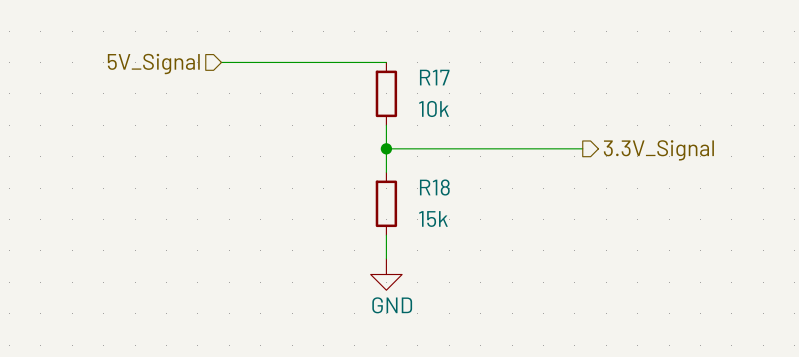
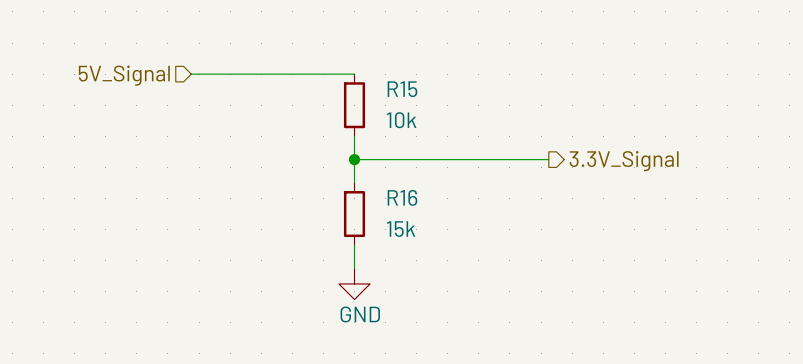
R17 name: R17 (434, 77) -> R15 (402, 89)
R18 name: R18 (434, 187) -> R16 (402, 197)

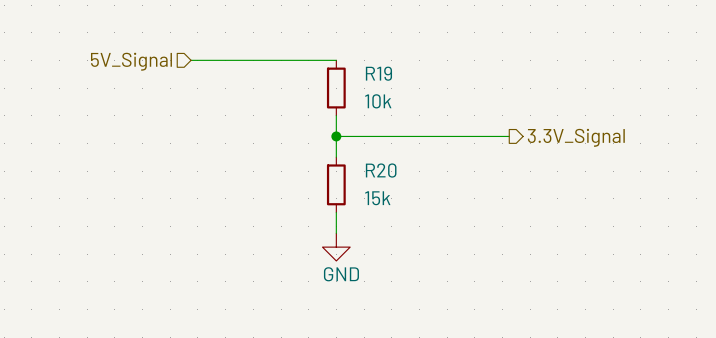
R15 name: R15 (402, 89) -> R19 (378, 73)
R16 name: R16 (402, 197) -> R20 (381, 170)

